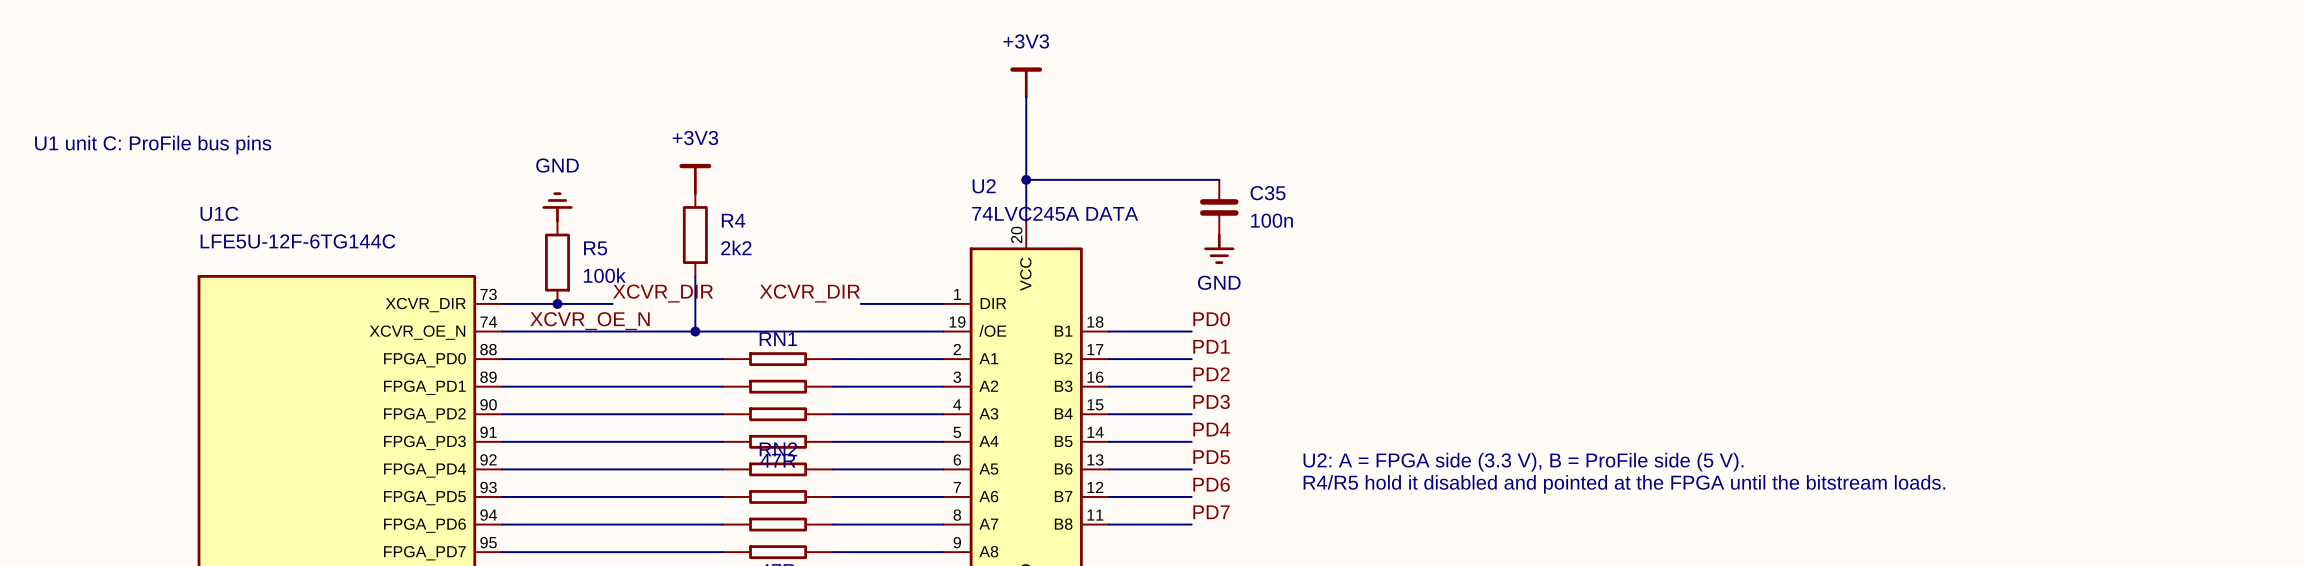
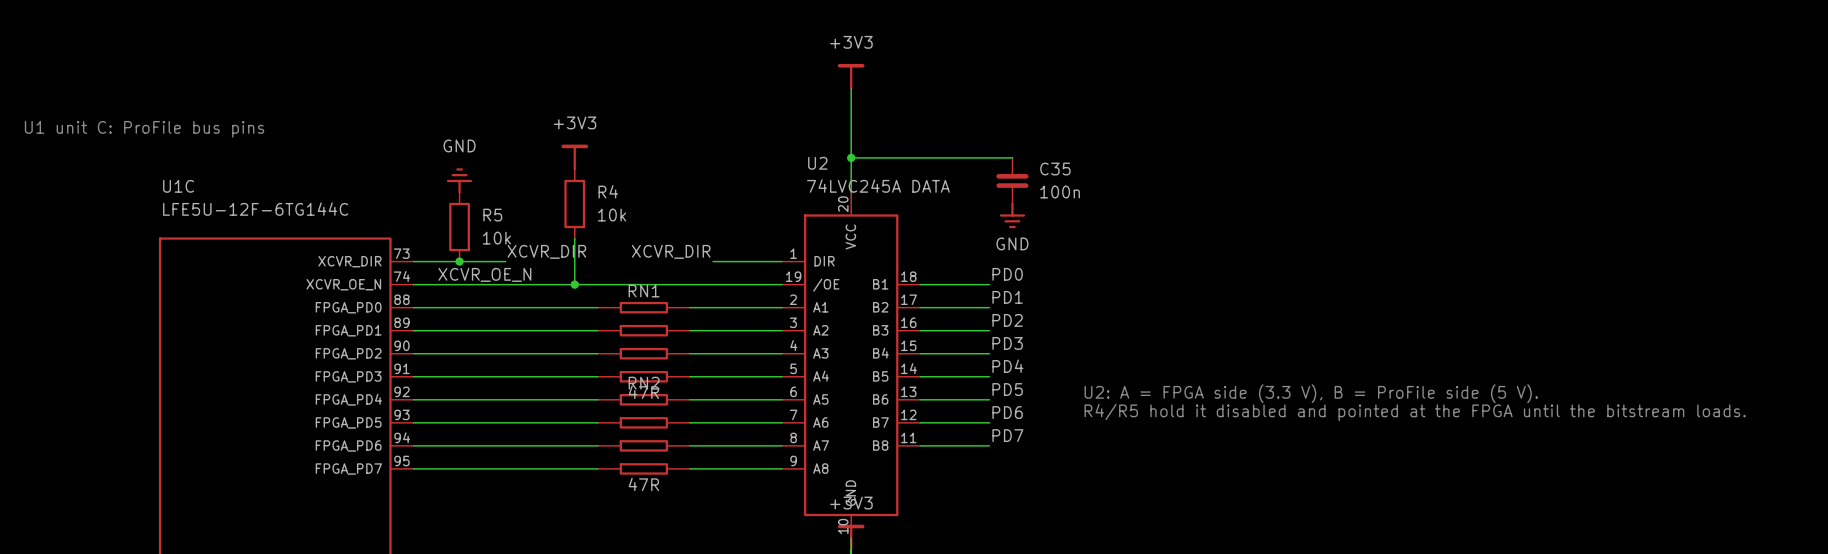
R4 value: 2k2 (736, 247) -> 10k (612, 215)
R5 value: 100k (604, 275) -> 10k (496, 238)

